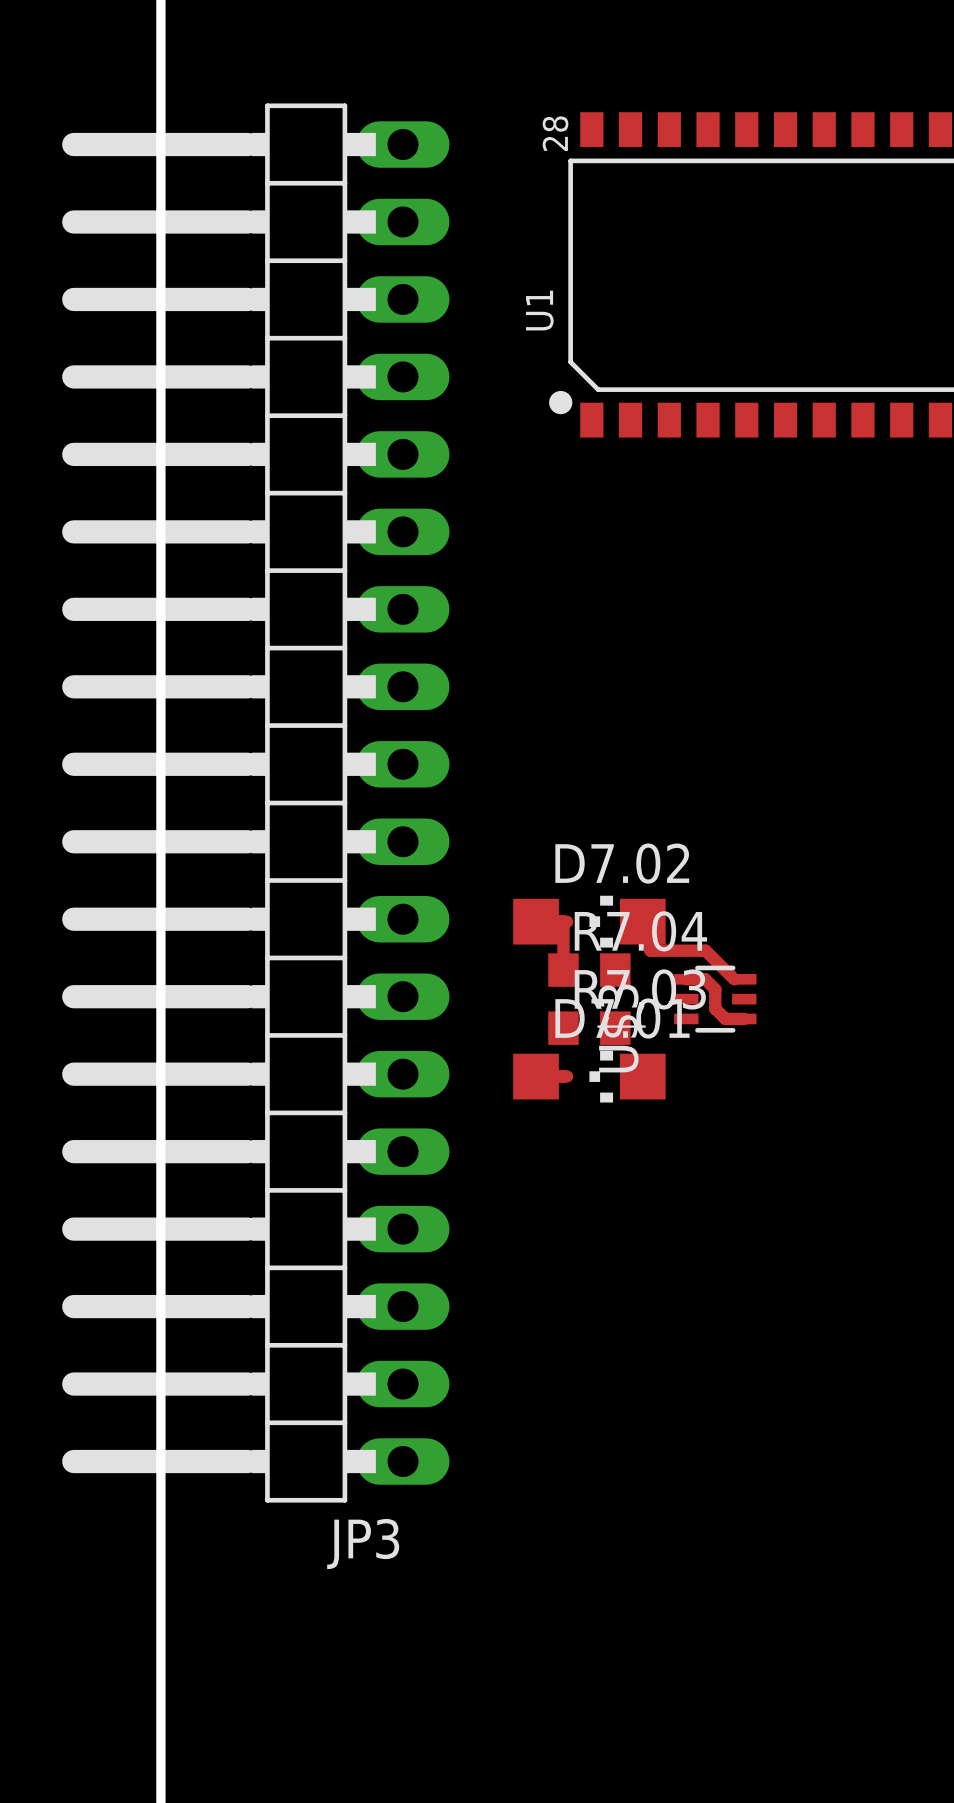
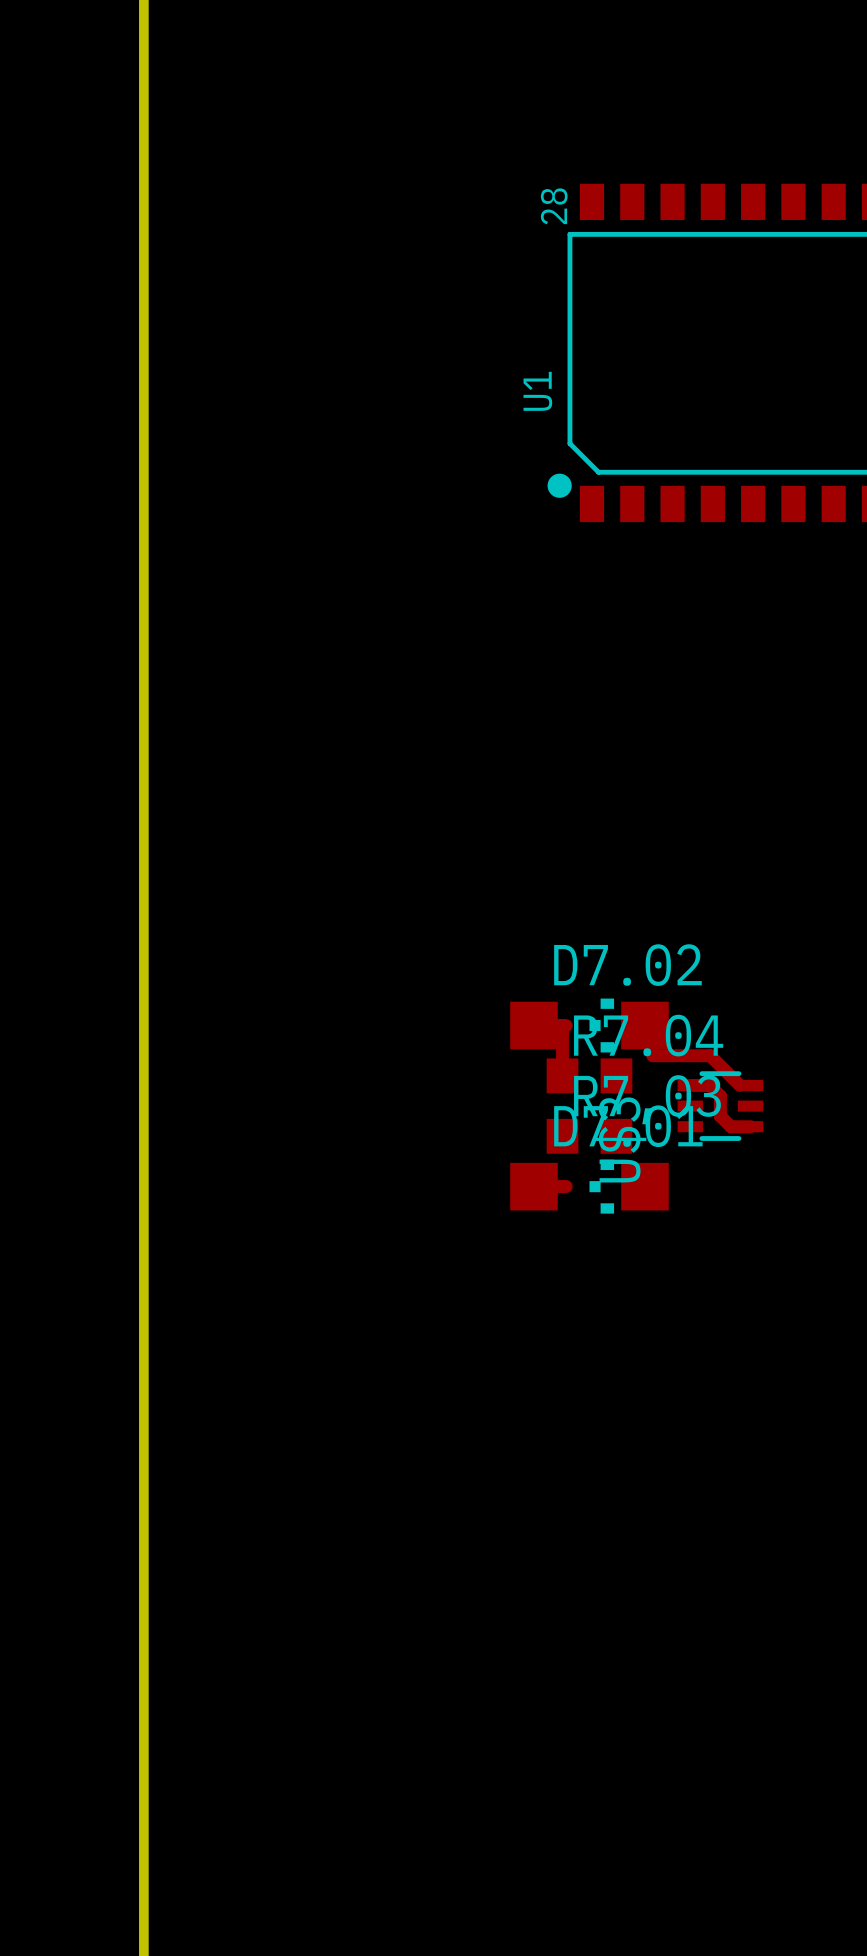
JP3: (255, 803) -> none

